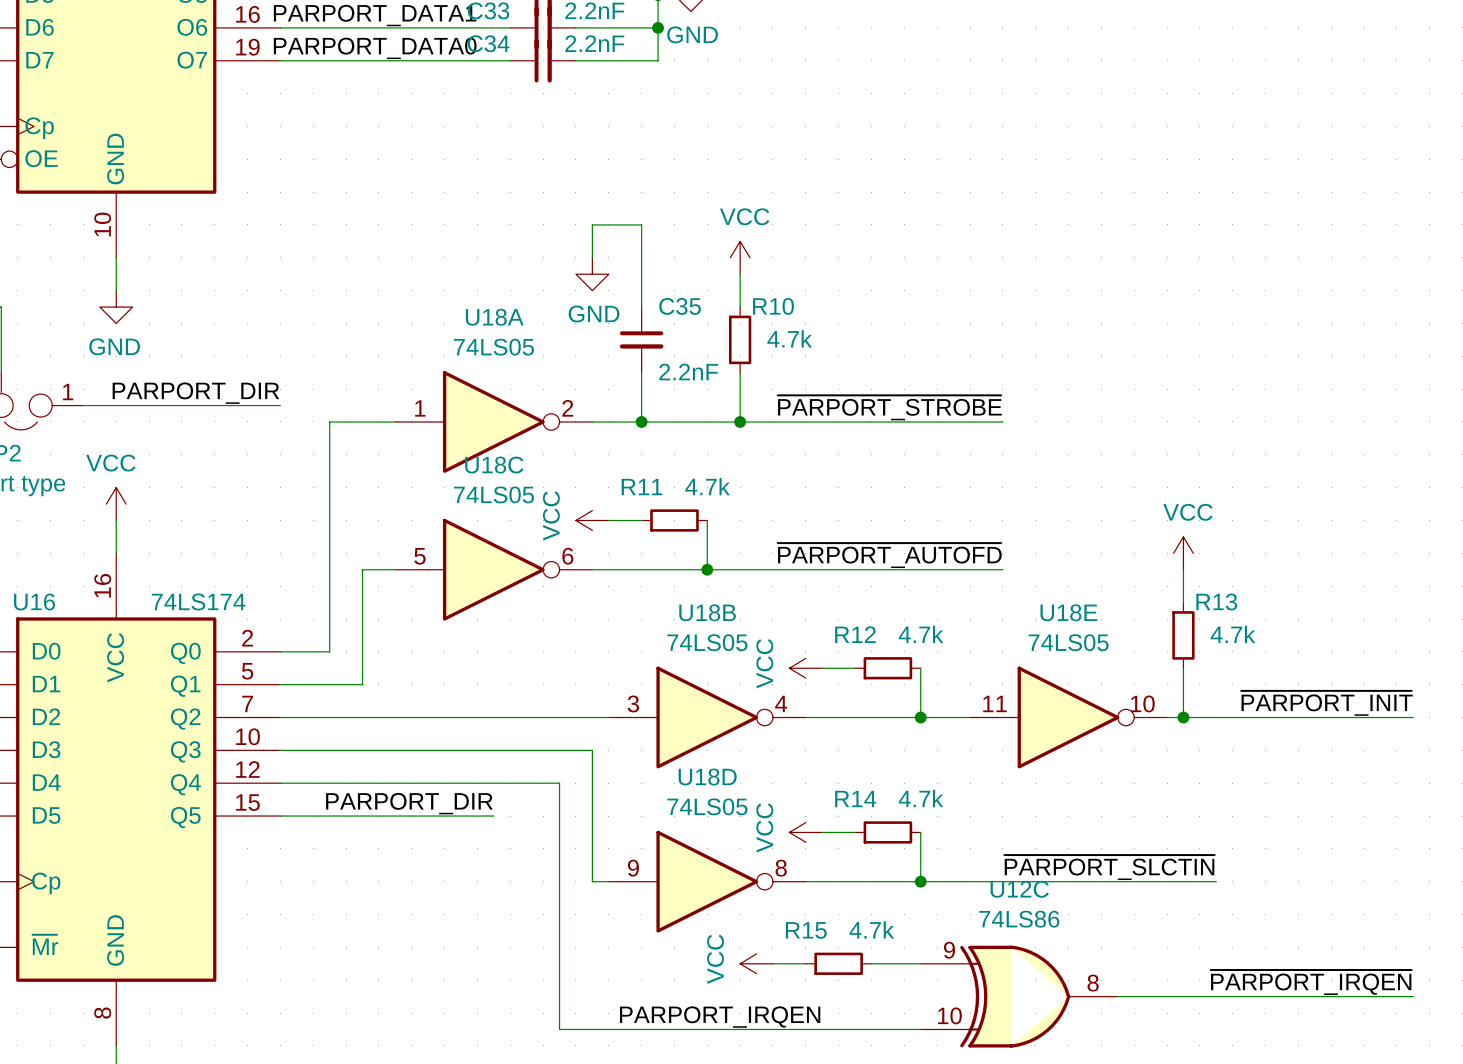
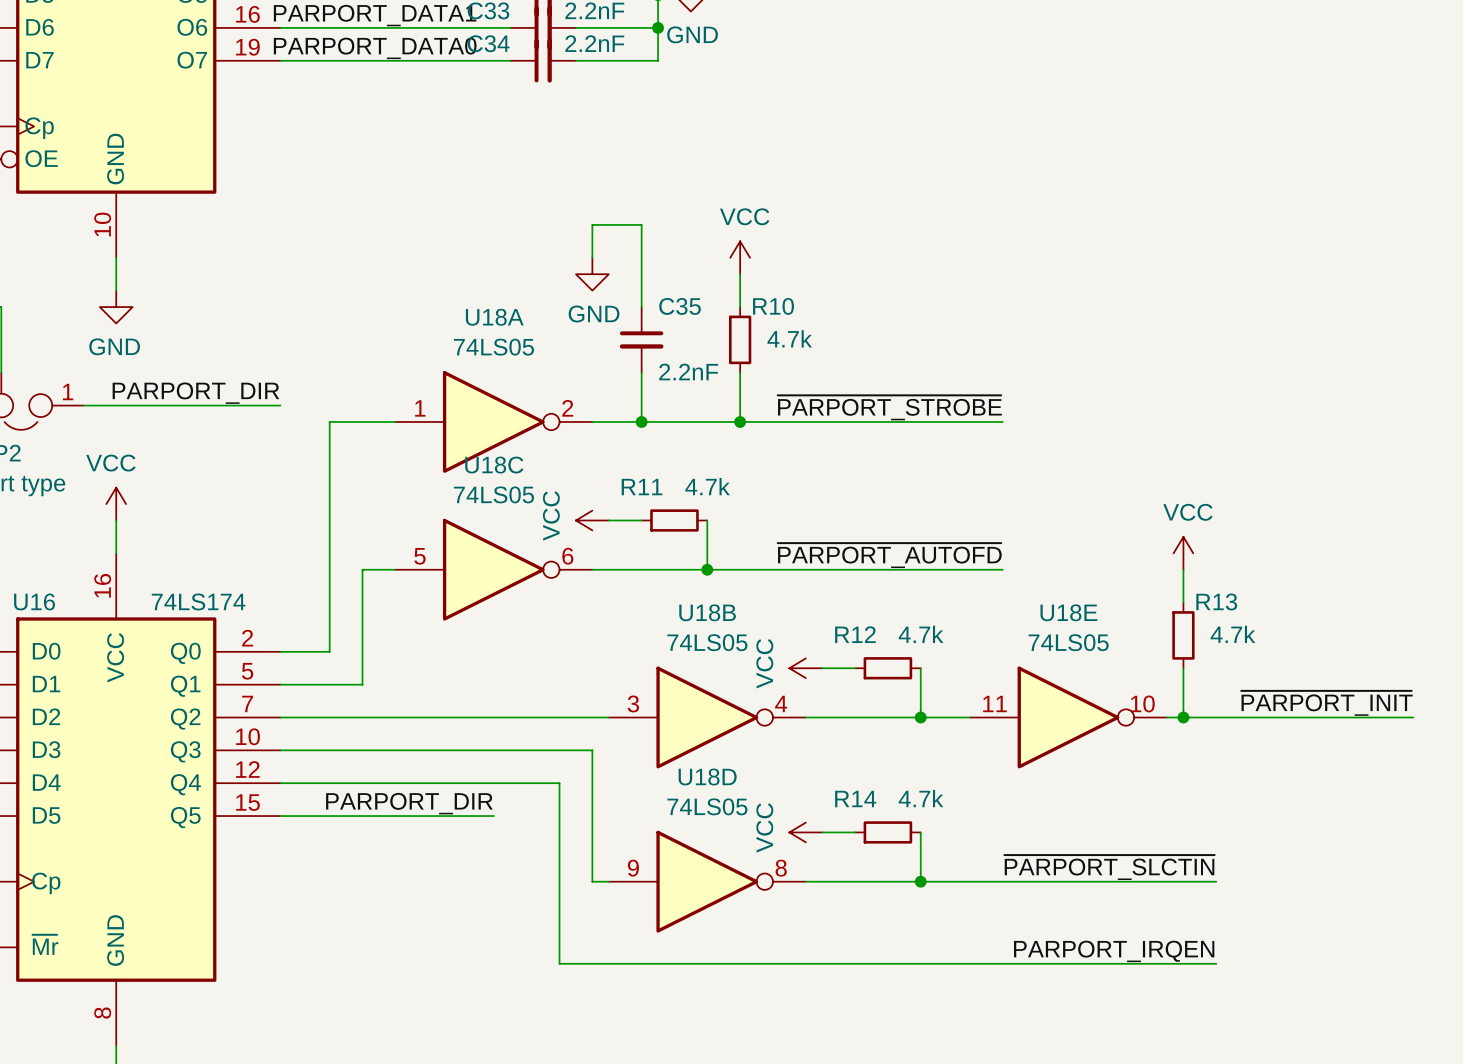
wire: (559, 963) (559, 1029) (920, 1029) -> (559, 963) (772, 963)
power symbol: VCC (756, 963) -> none
wire: none -> (805, 963) (871, 963)
R15: 4.7k (838, 963) -> none
label: ~{PARPORT_IRQEN} (1311, 982) -> PARPORT_IRQEN (1114, 951)
U12C: 74LS86 (1019, 996) -> none
wire: (1117, 996) (1413, 996) -> (920, 963) (1216, 963)
label: PARPORT_IRQEN (720, 1017) -> none

